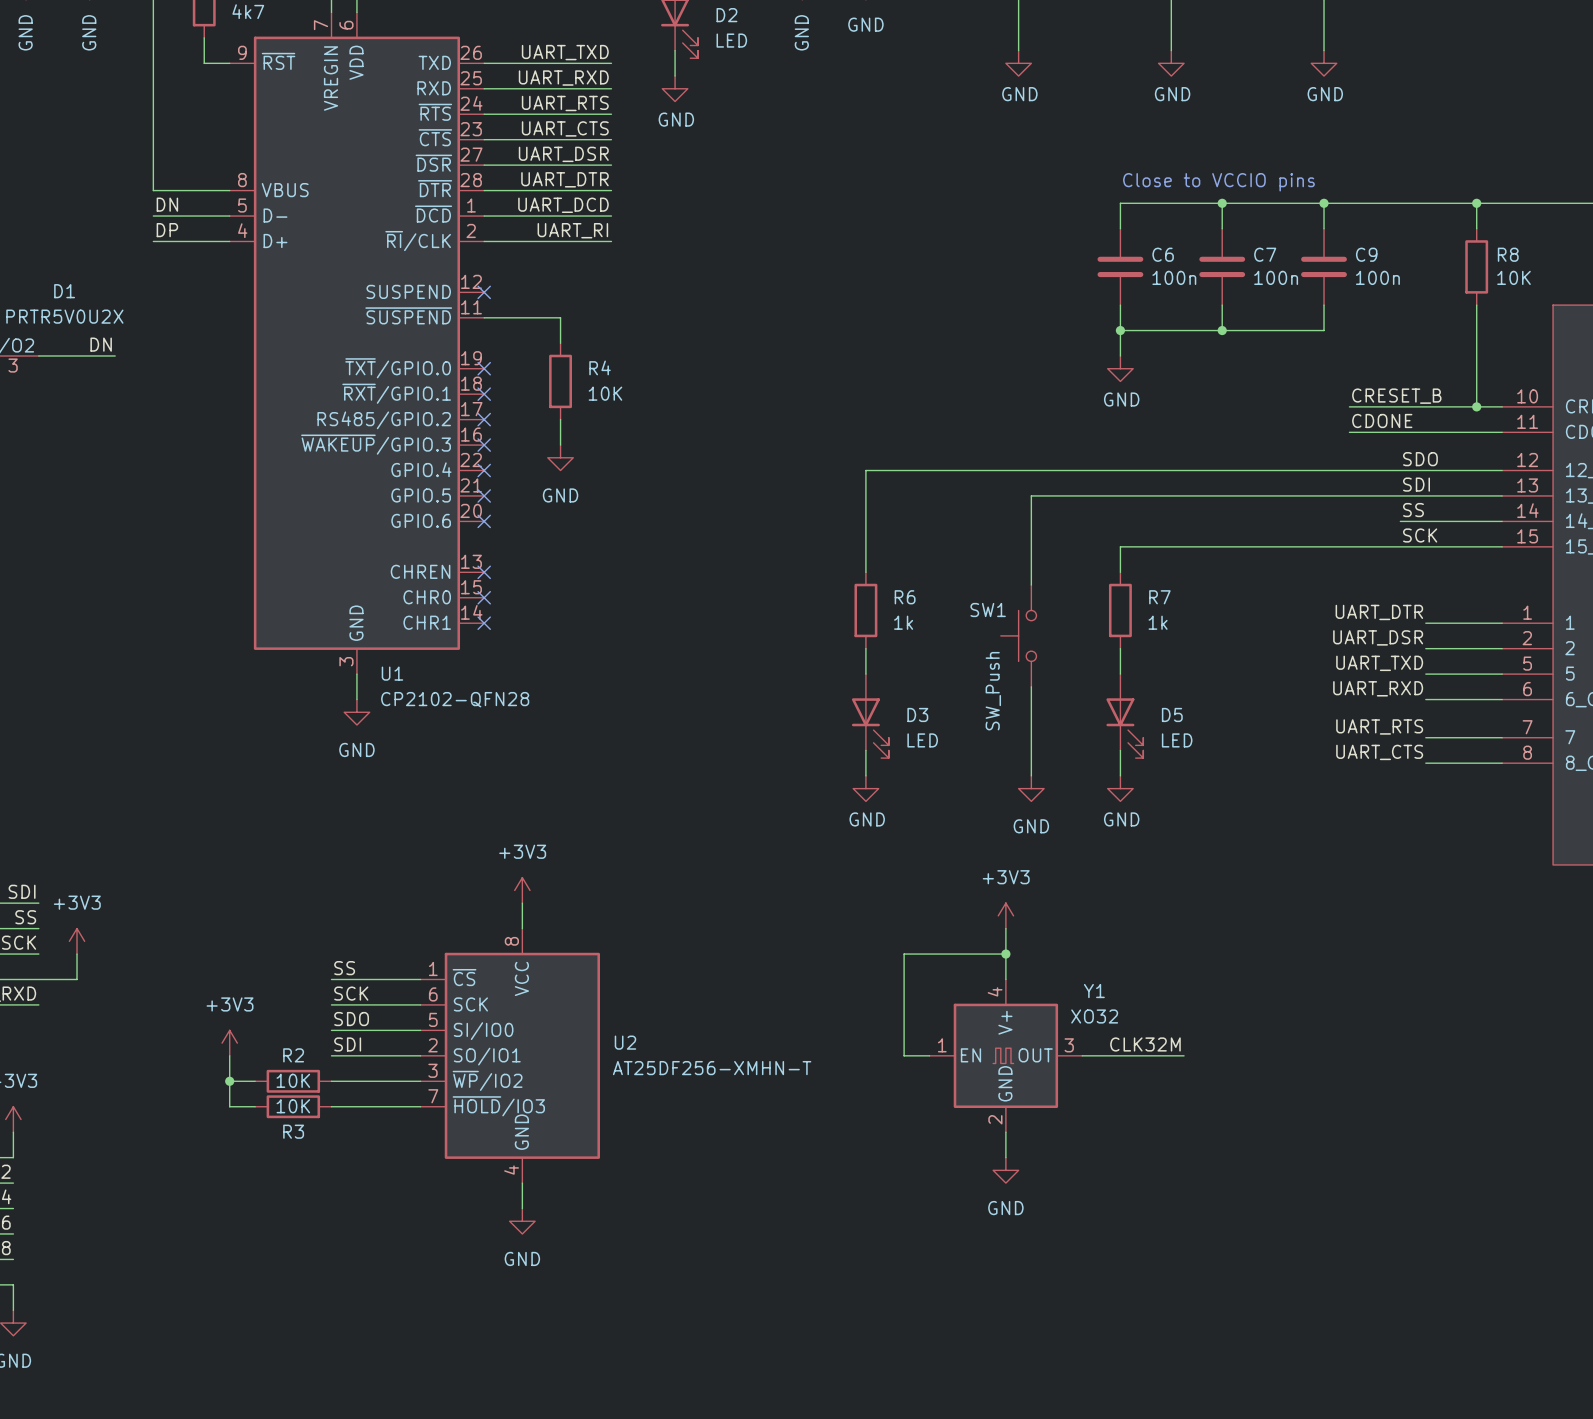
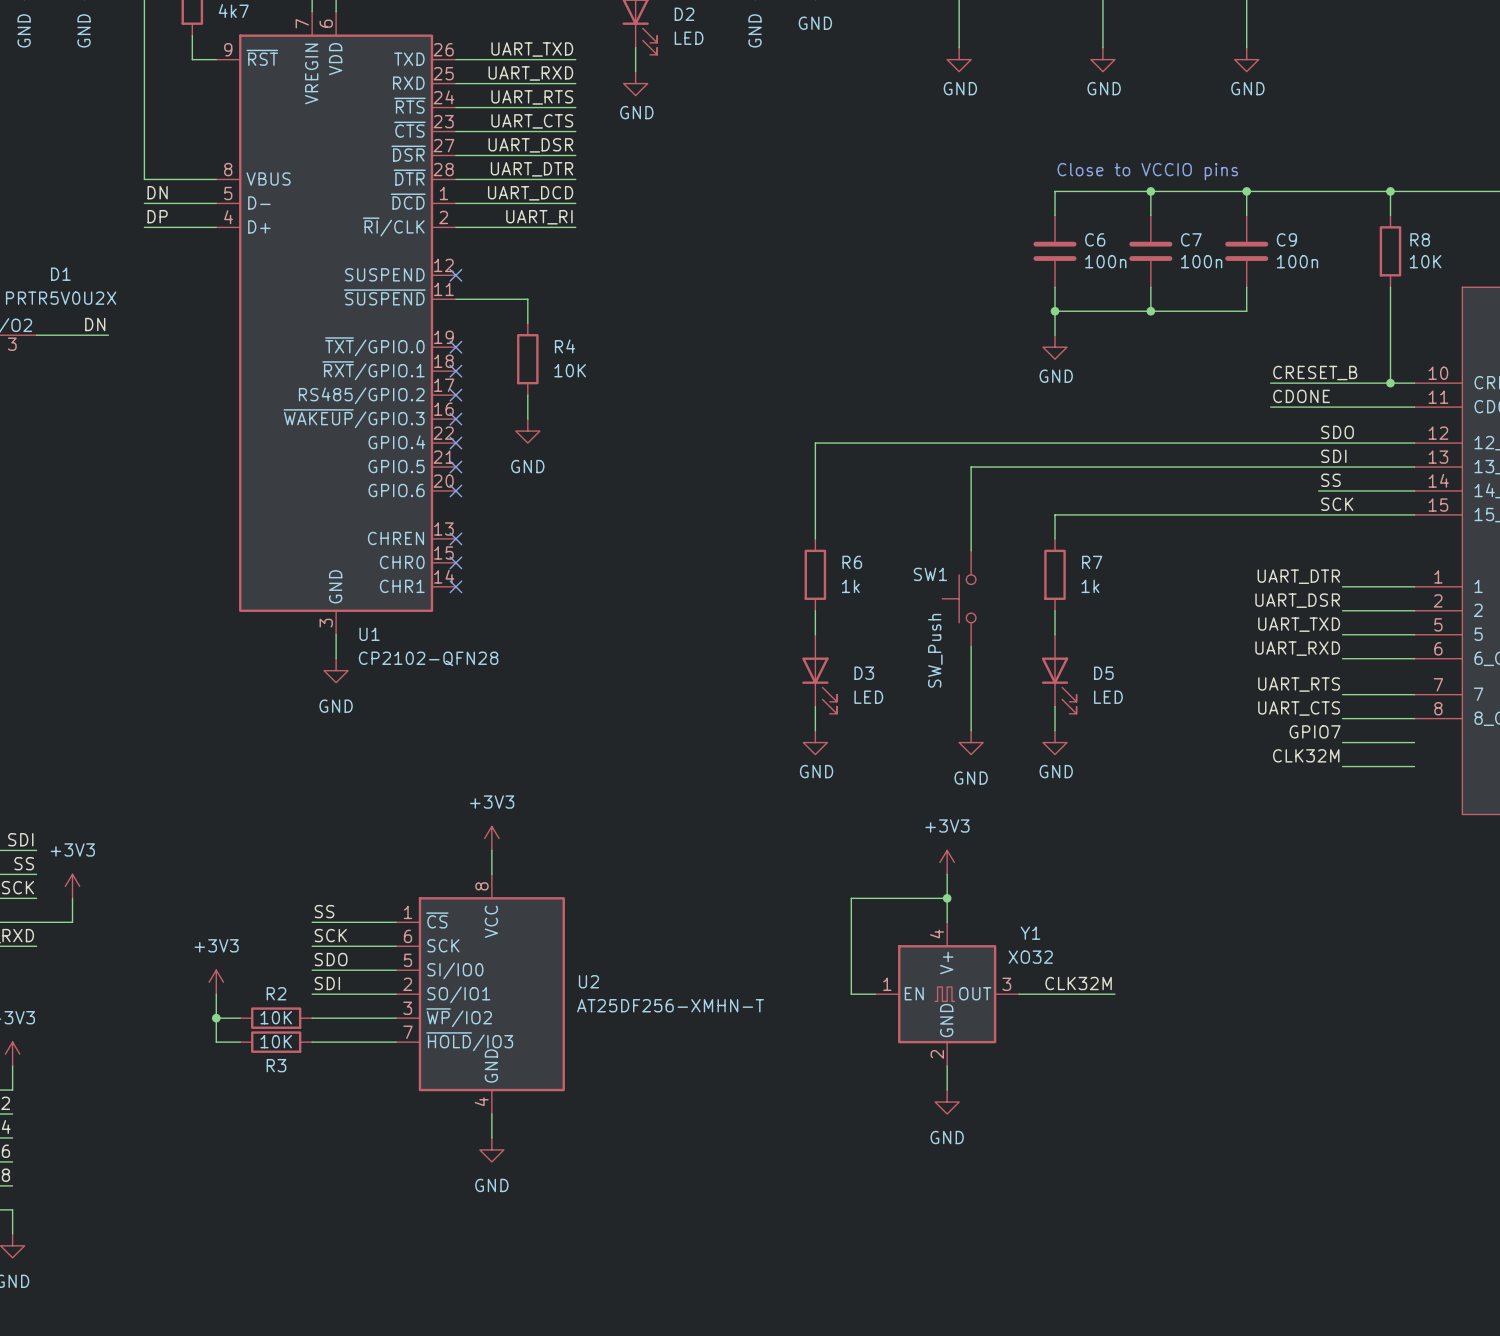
label: none -> GPIO7 (1315, 731)
wire: none -> (1342, 742) (1414, 742)
label: none -> CLK32M (1306, 755)
wire: none -> (1342, 766) (1414, 766)

